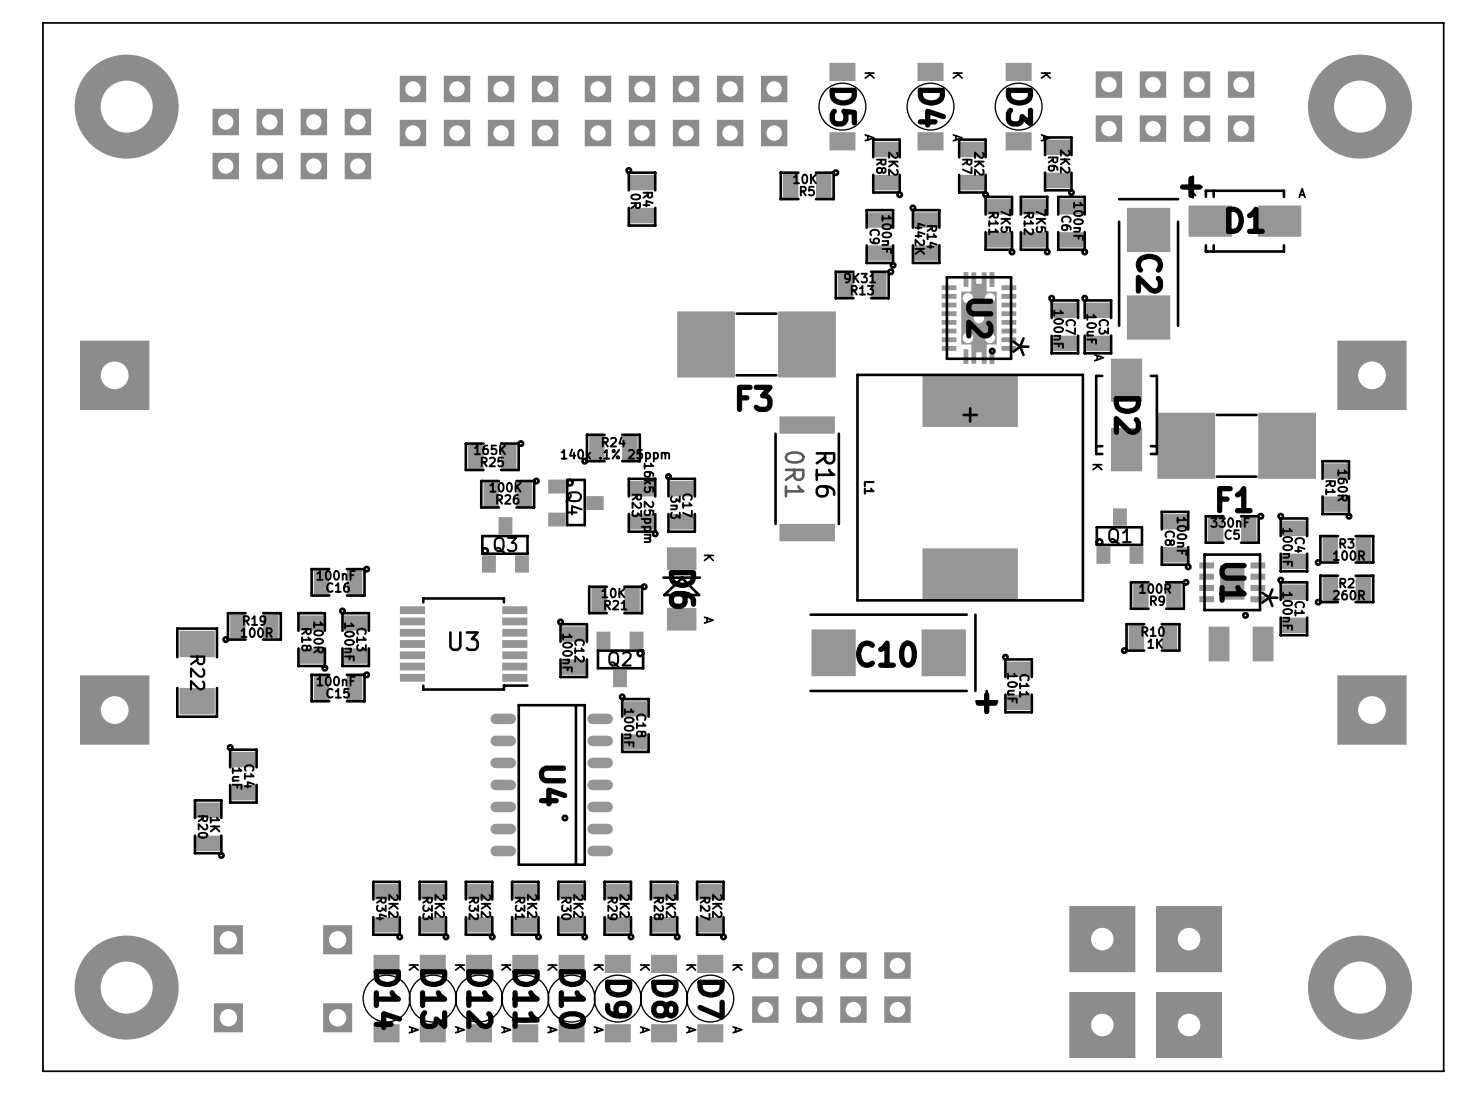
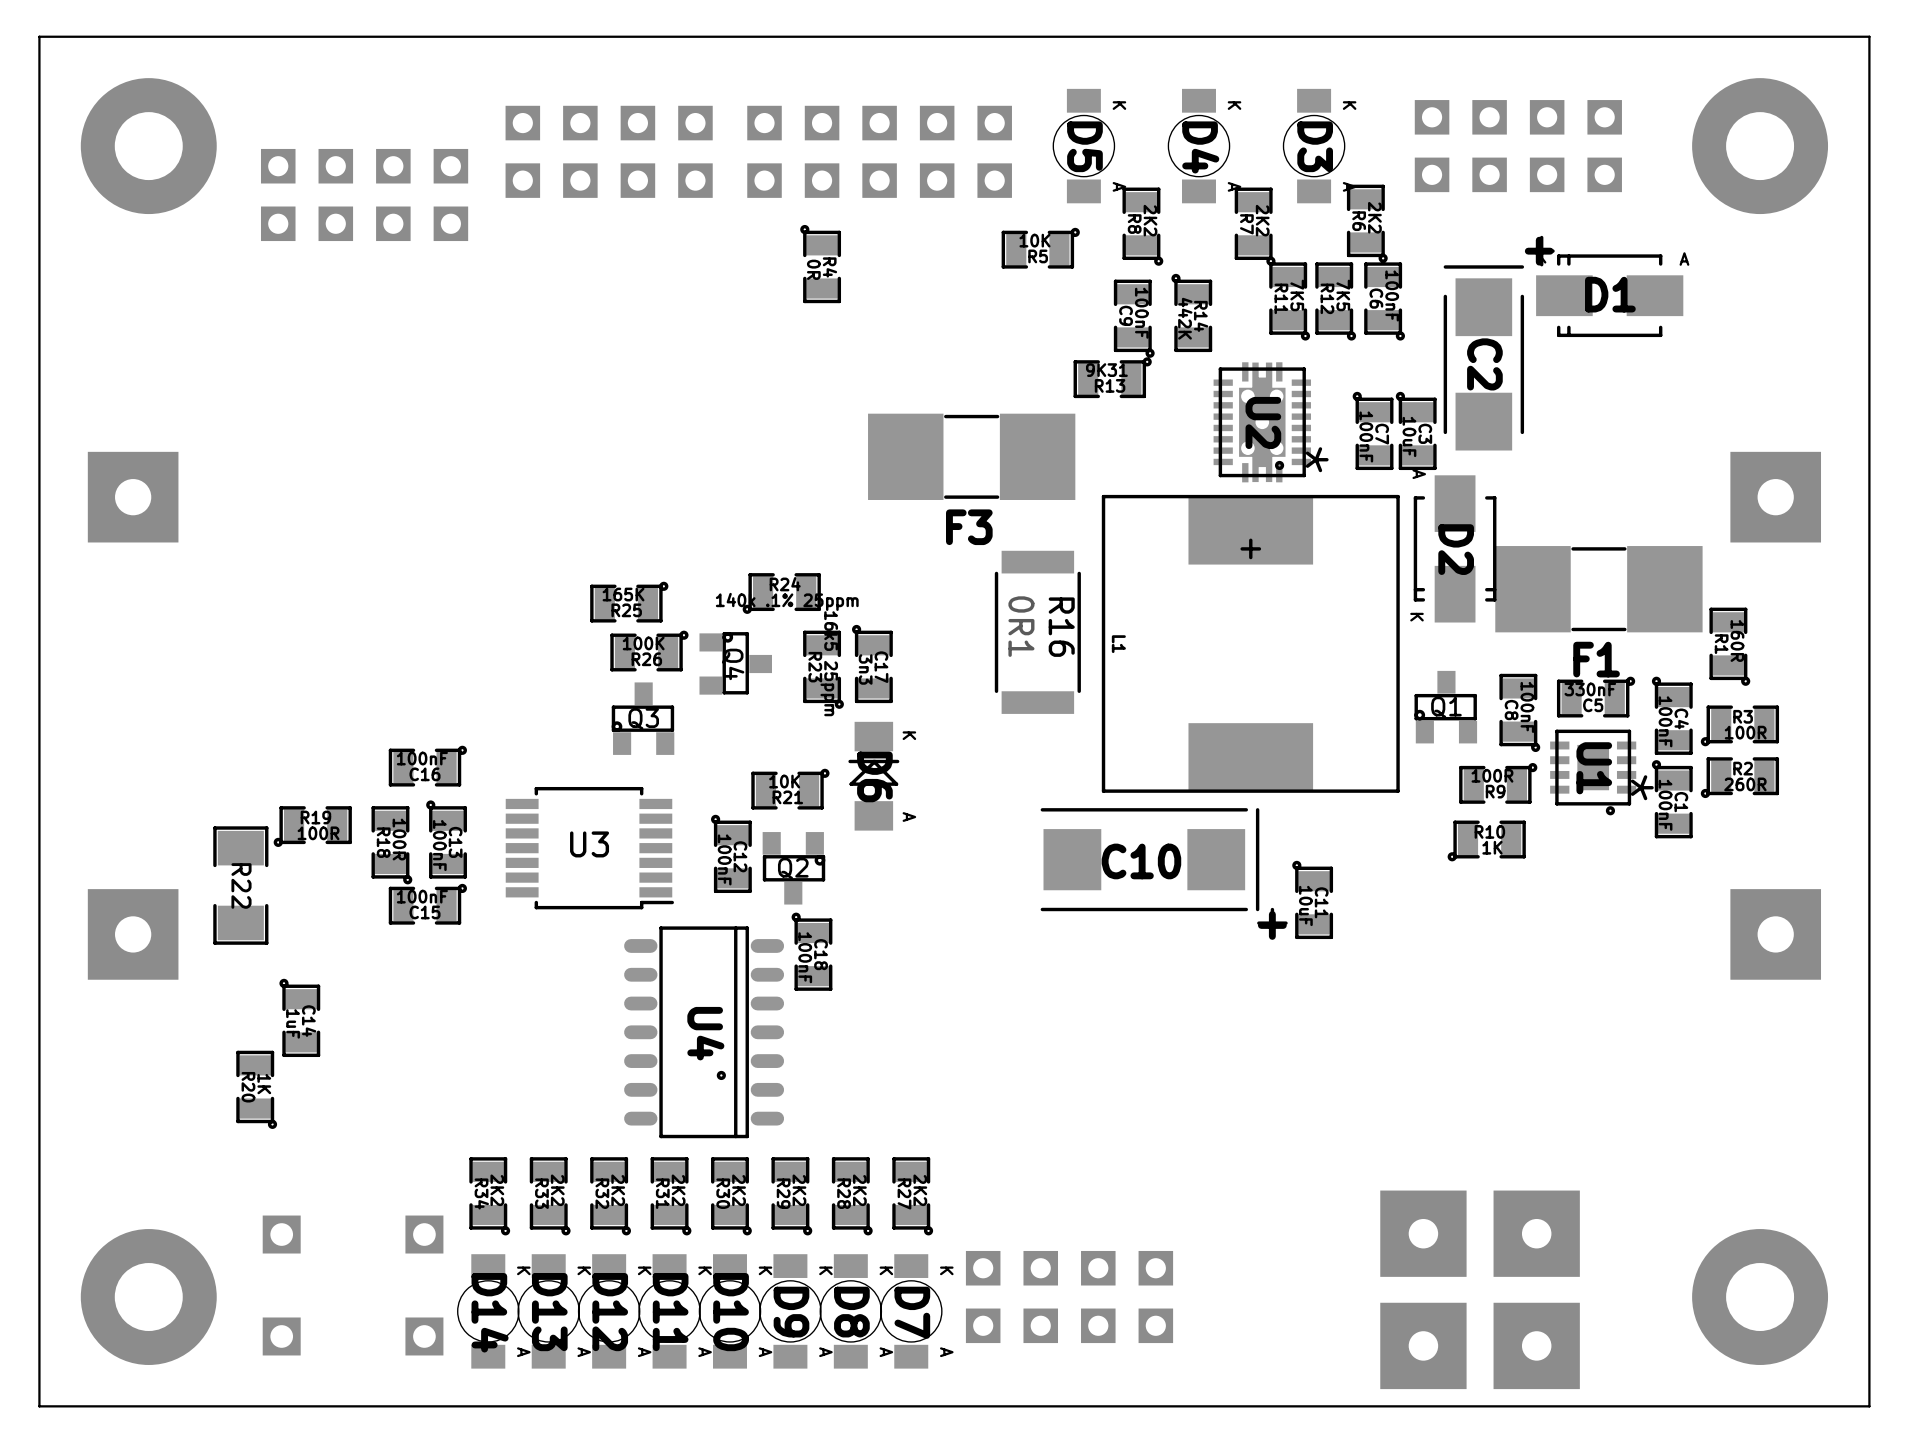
part: (1241, 644) -> none

